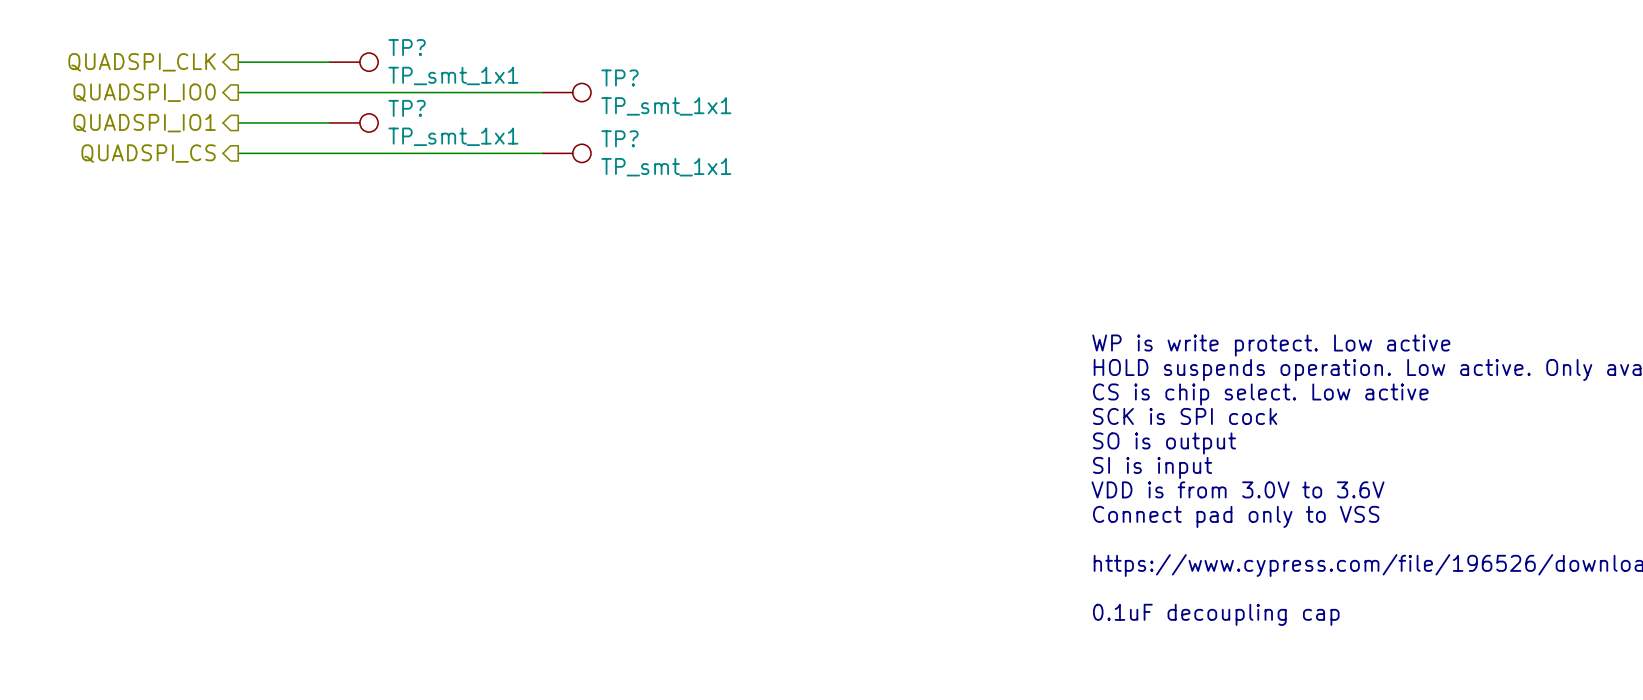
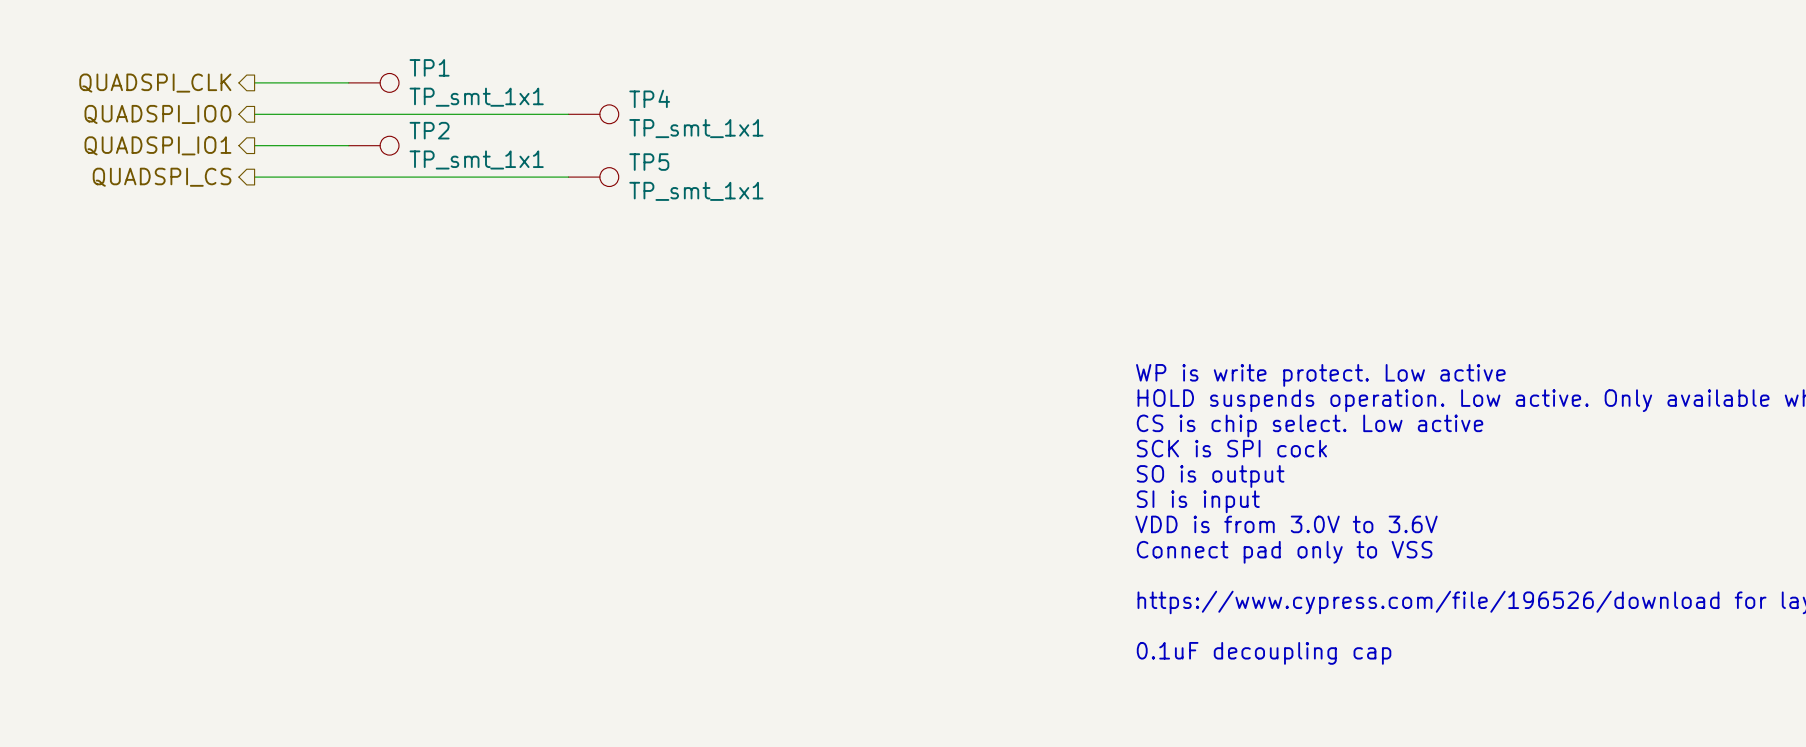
TP? name: TP? (407, 47) -> TP1 (429, 67)
TP? name: TP? (619, 77) -> TP4 (649, 98)
TP? name: TP? (407, 108) -> TP2 (429, 130)
TP? name: TP? (619, 138) -> TP5 (649, 162)

